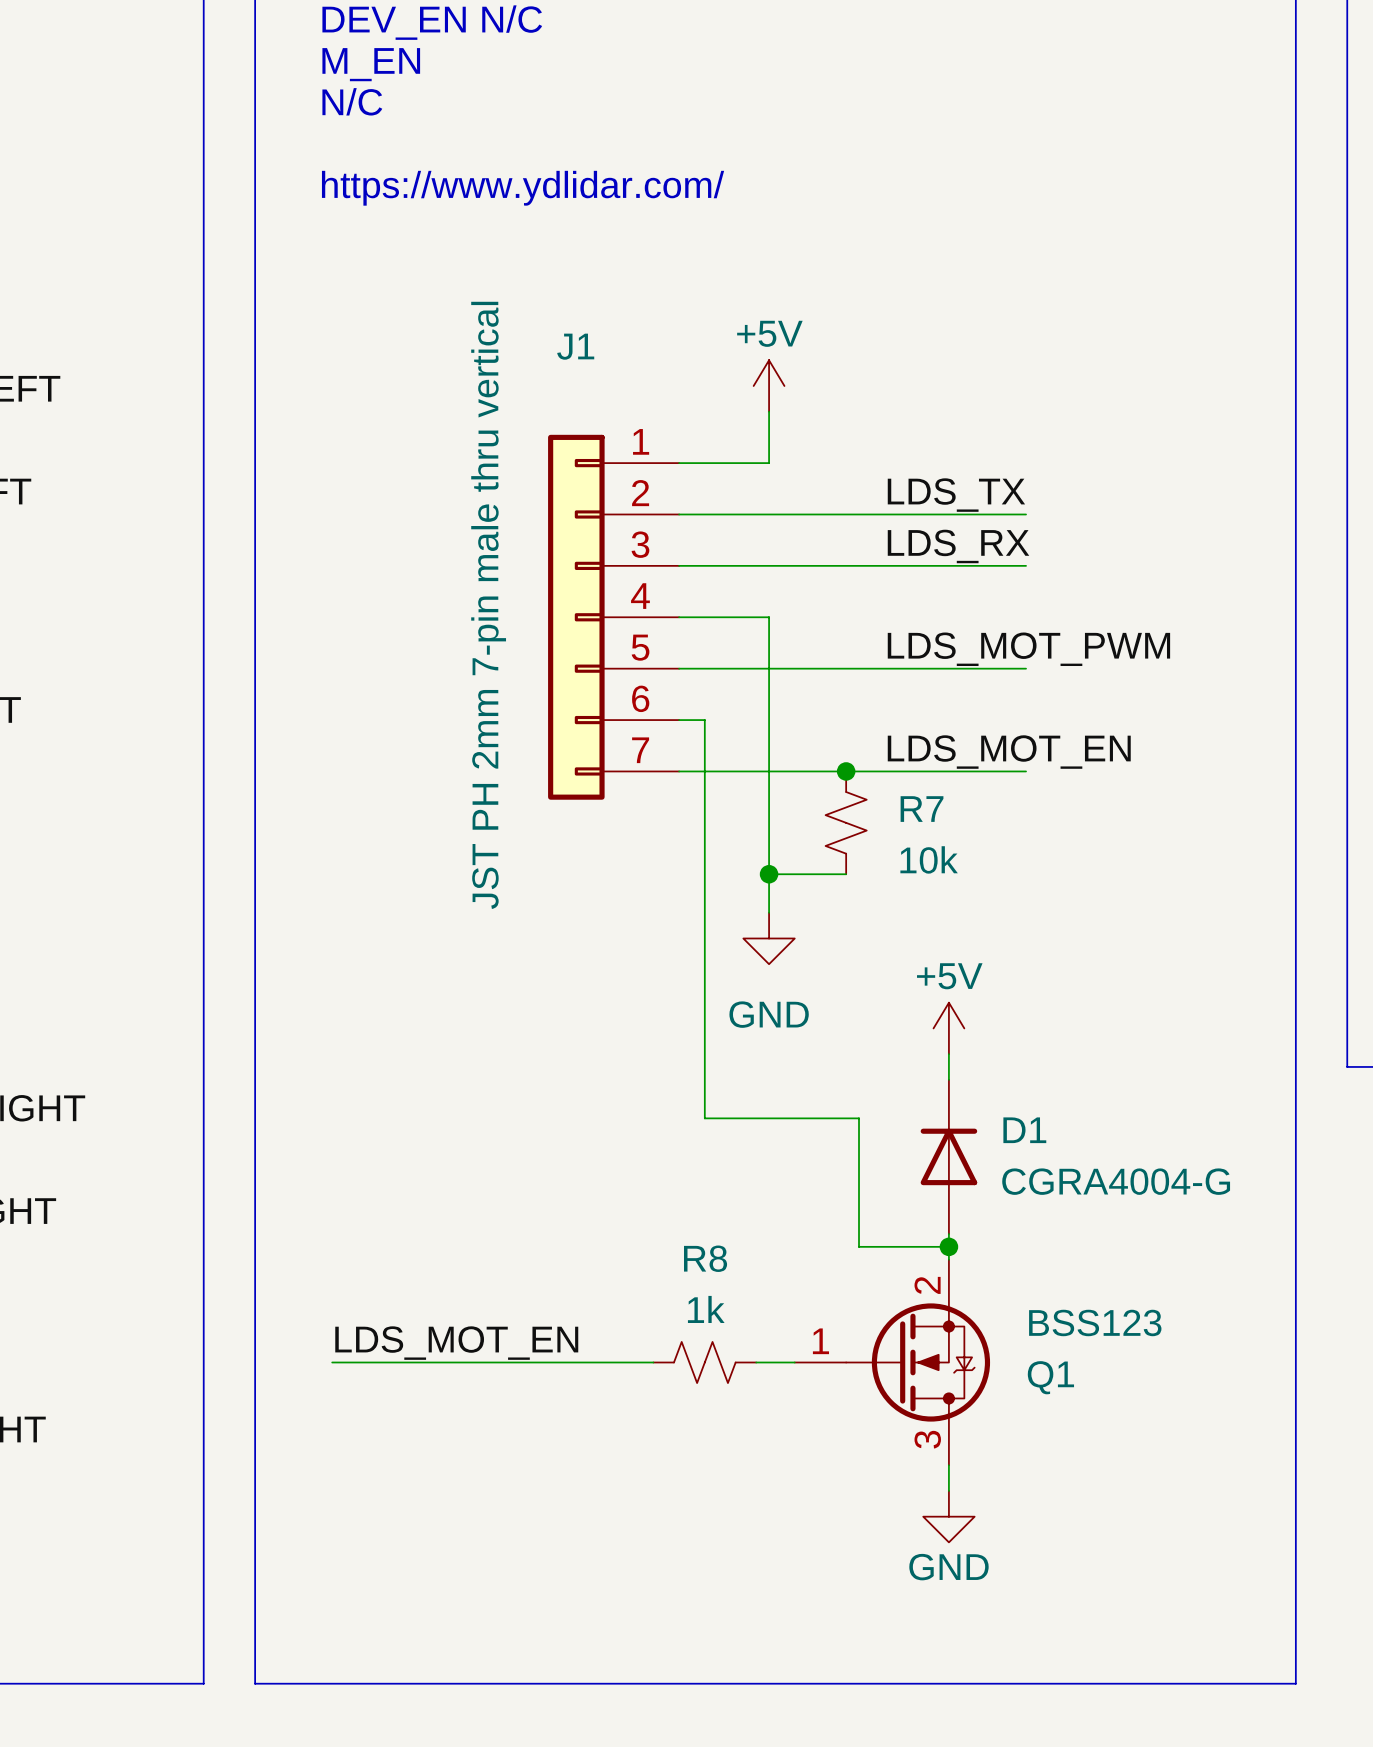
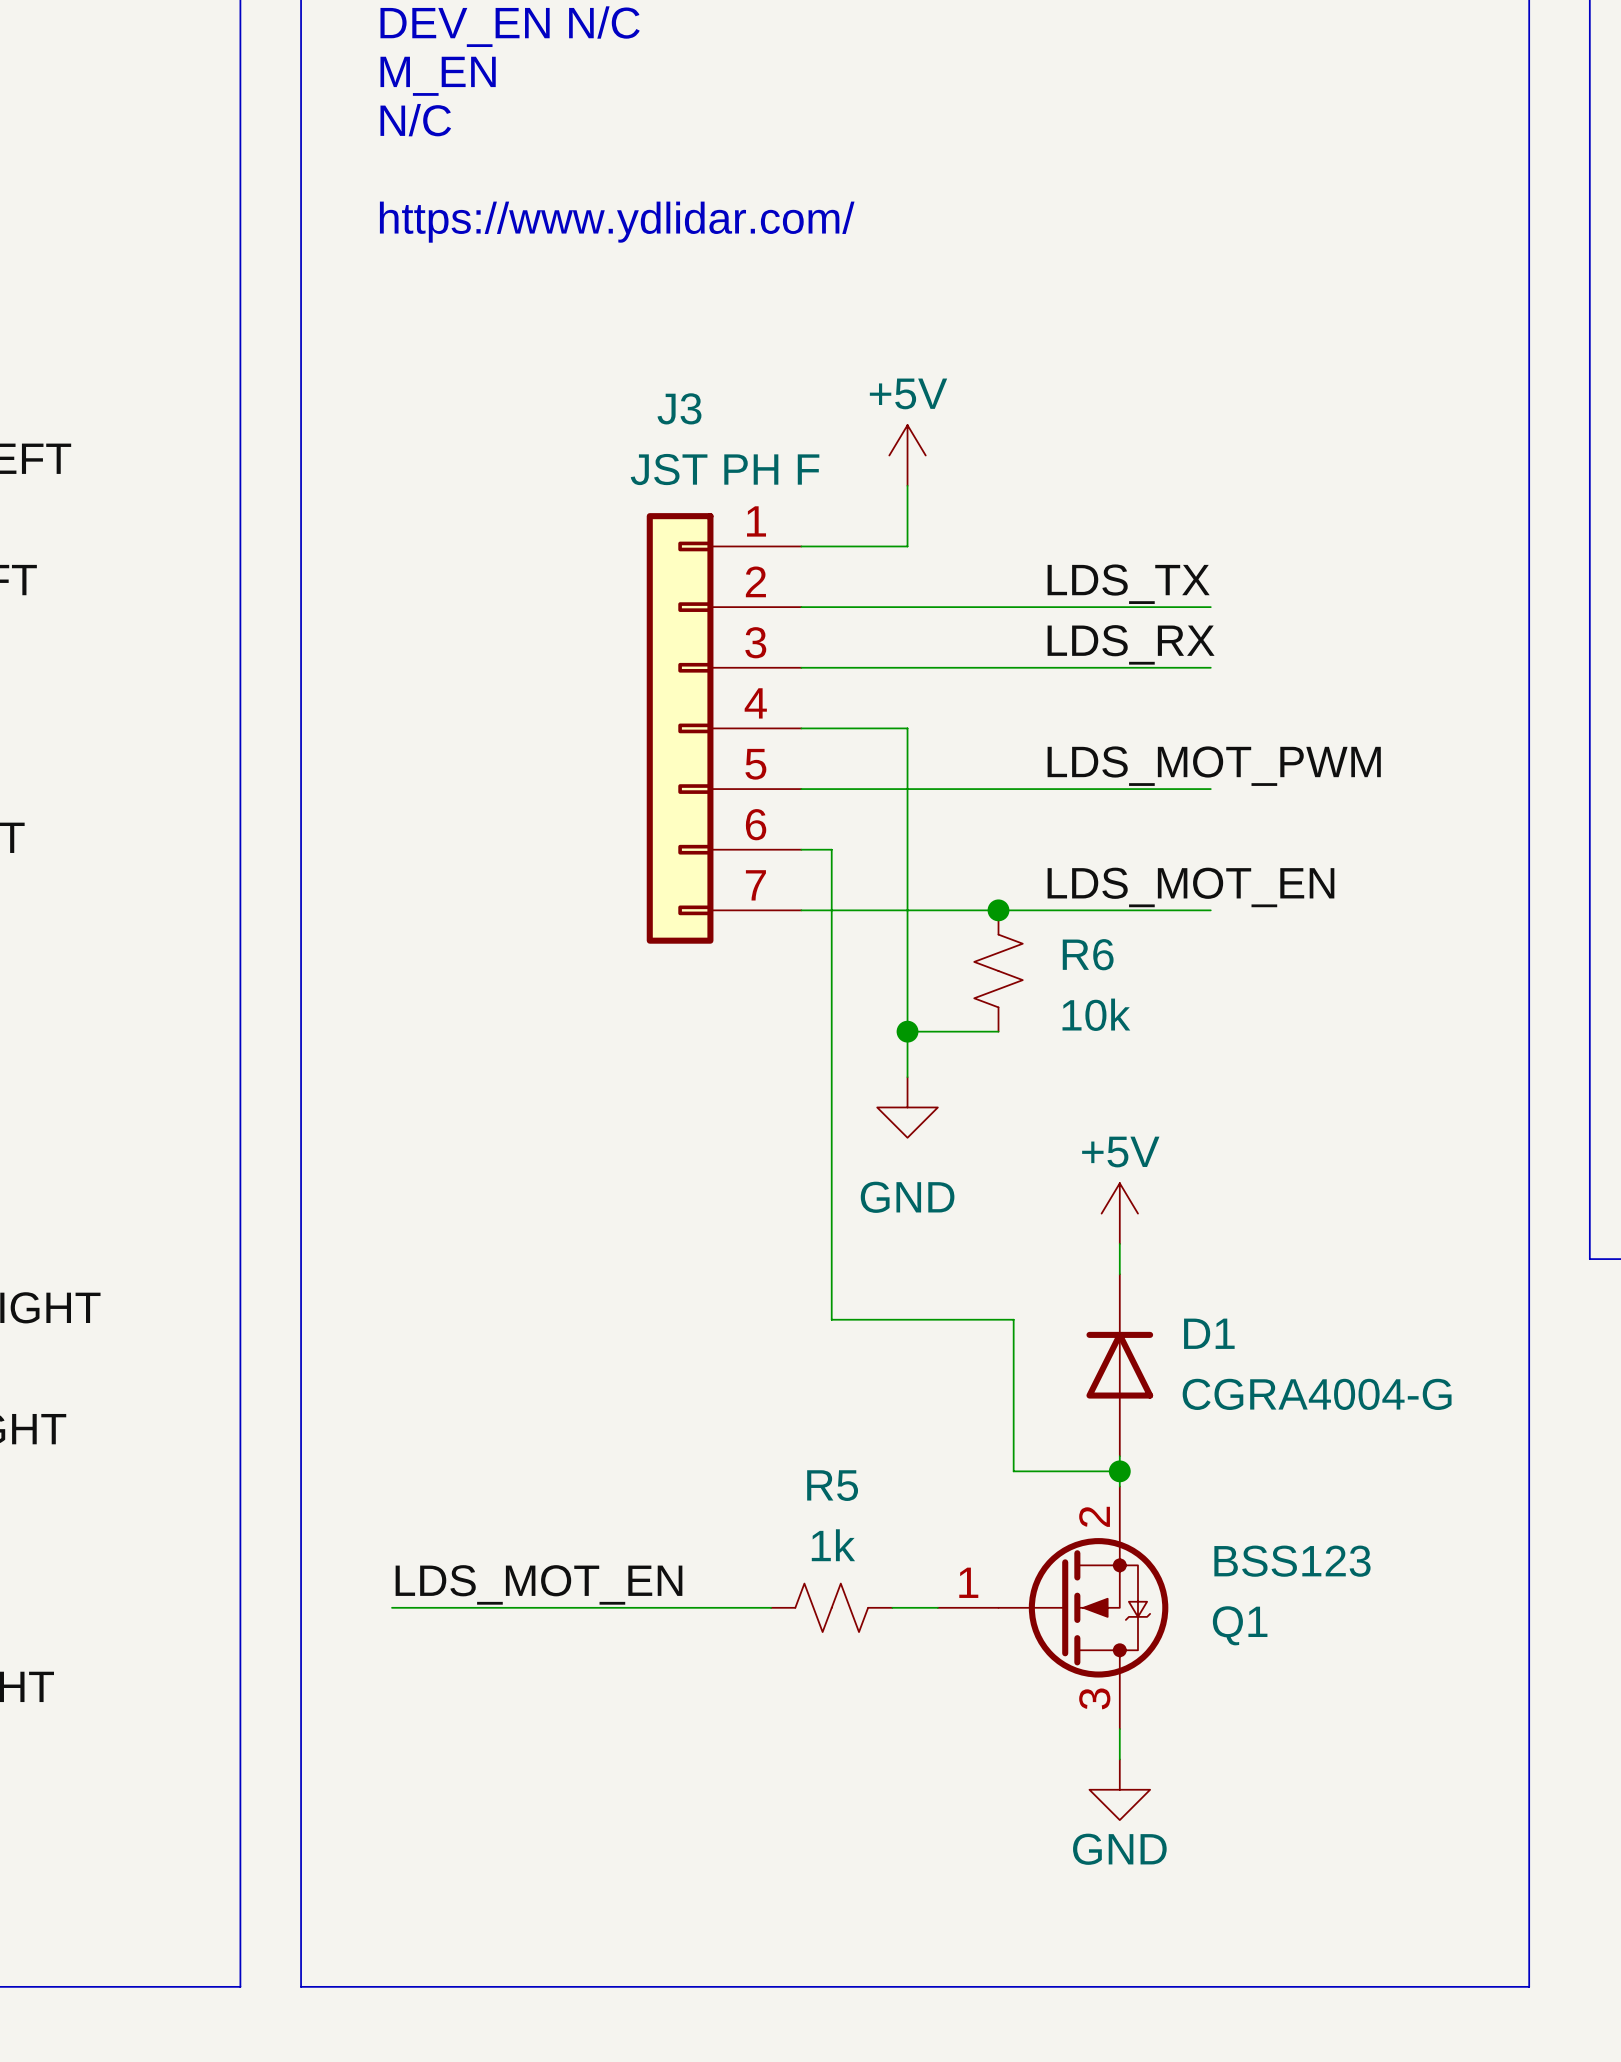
J1 name: J1 (575, 346) -> J3 (679, 408)
J1 value: JST PH 2mm 7-pin male thru vertical (488, 605) -> JST PH F (725, 469)
R7 name: R7 (922, 809) -> R6 (1088, 954)
R8 name: R8 (705, 1258) -> R5 (832, 1485)

